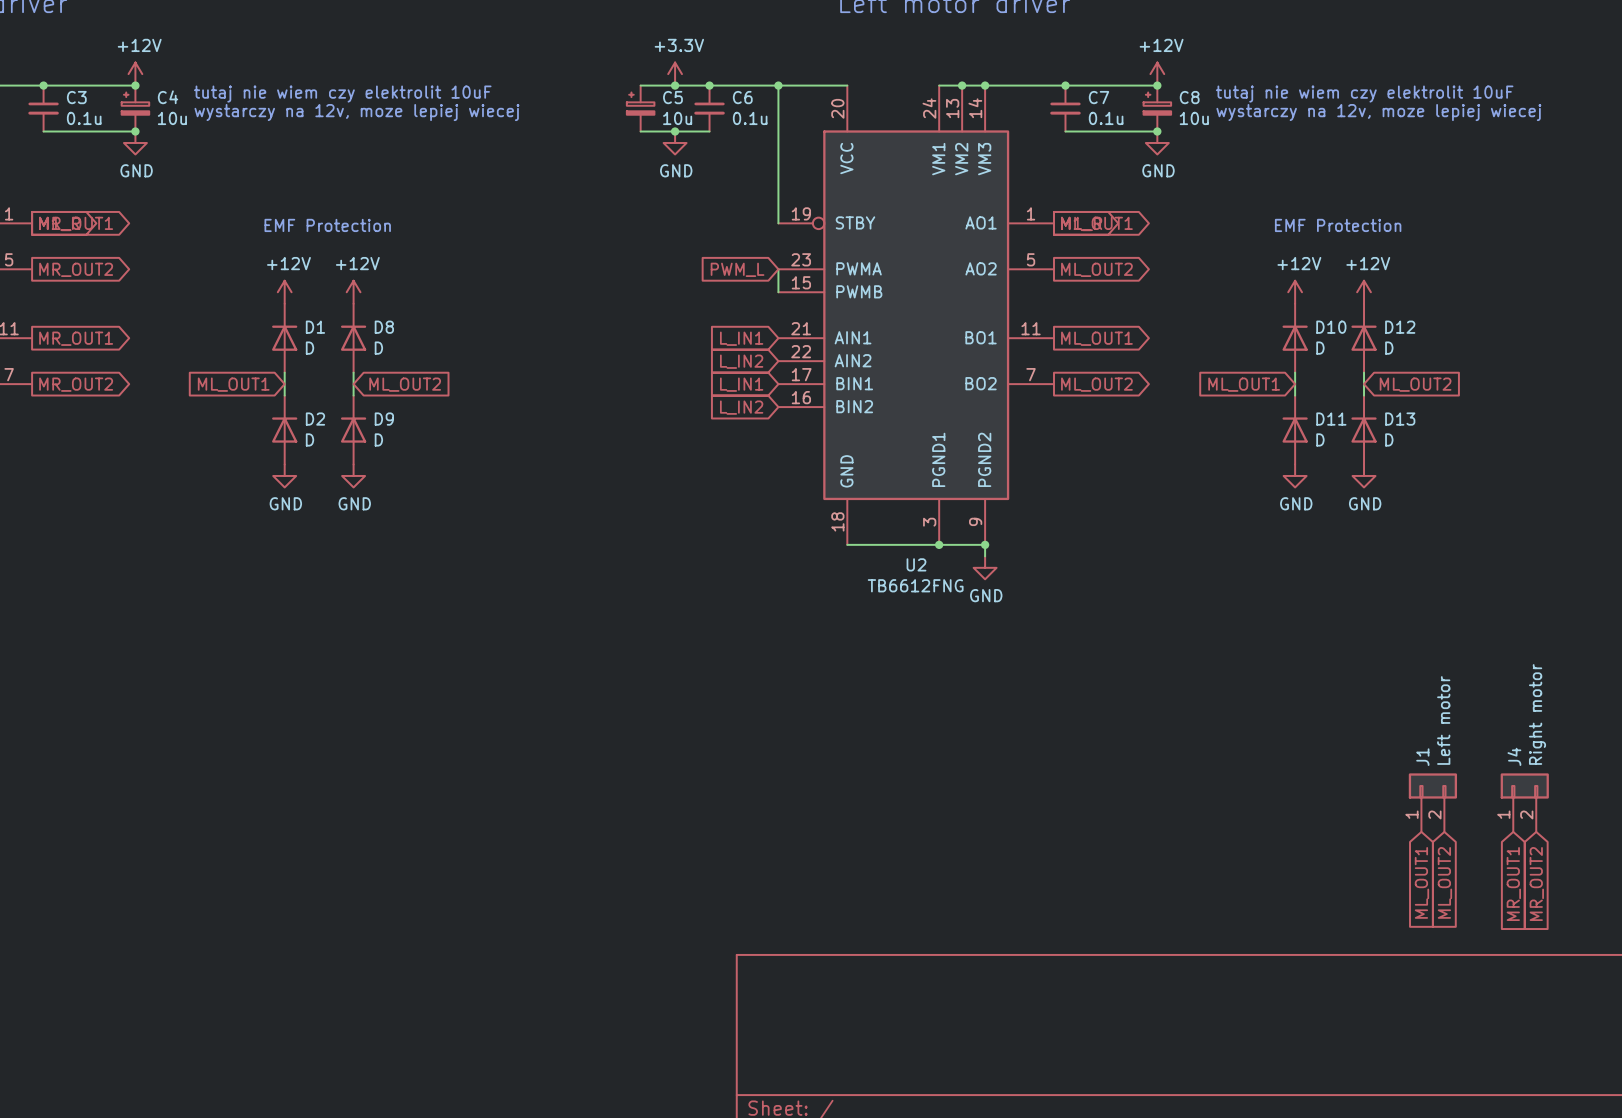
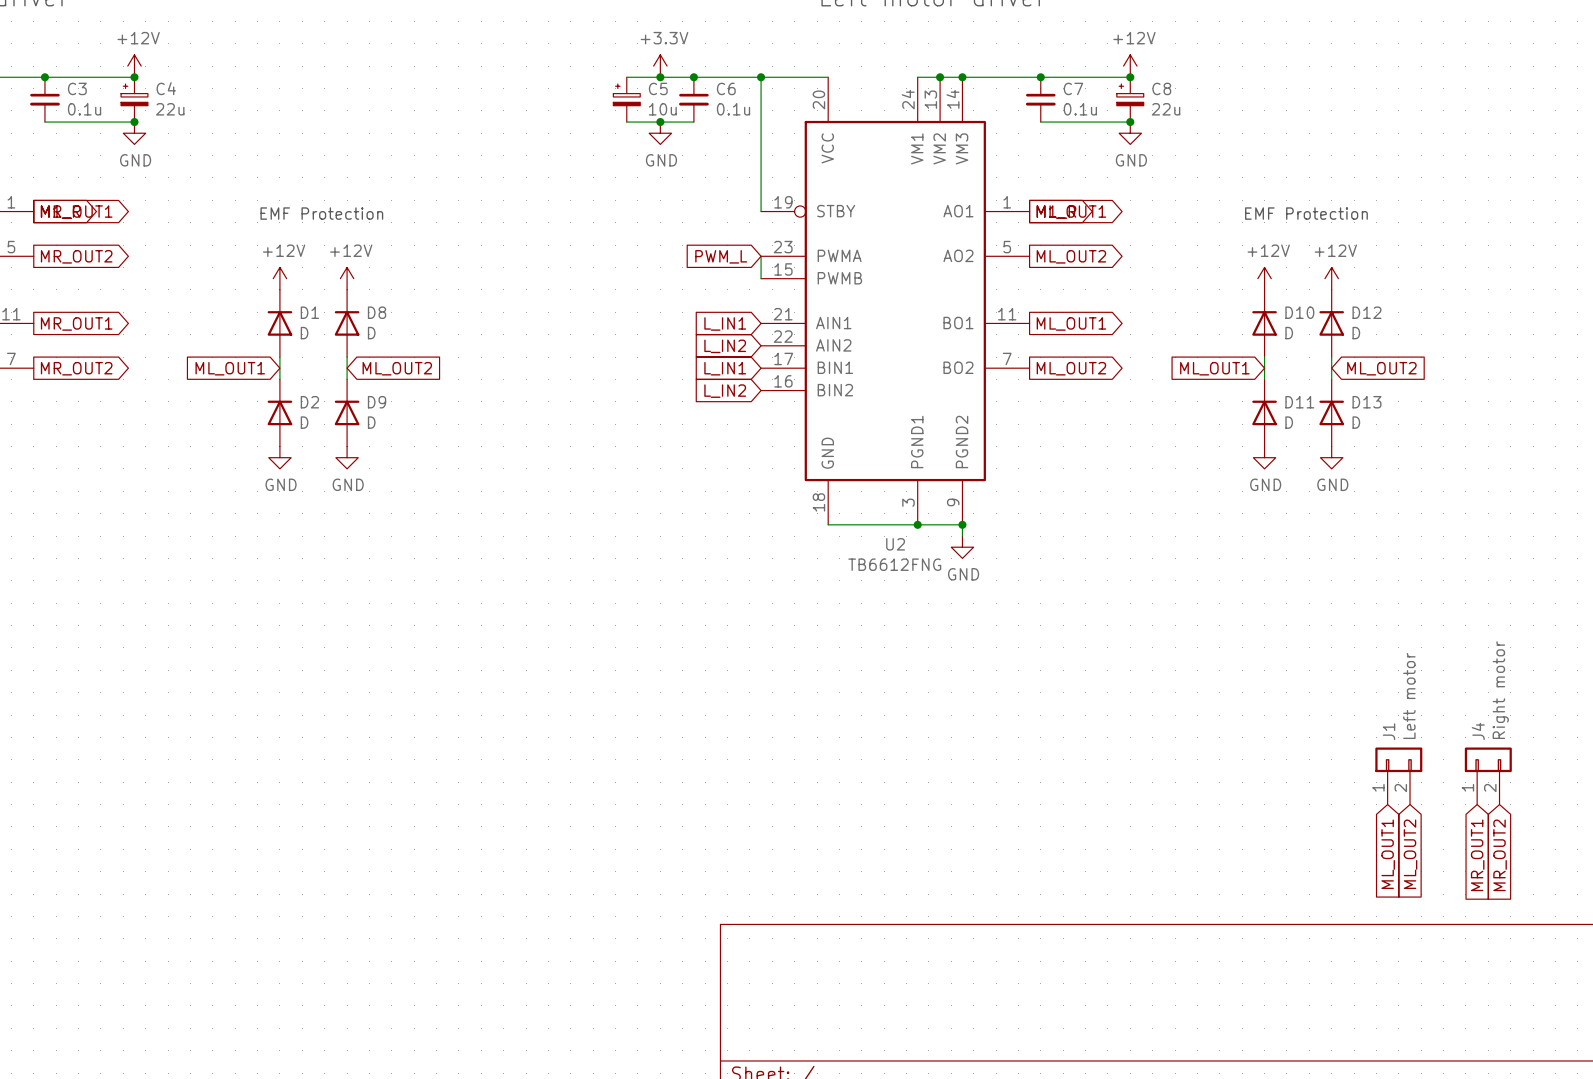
text: tutaj nie wiem czy elektrolit 10uF (342, 94) -> none
text: tutaj nie wiem czy elektrolit 10uF (1364, 94) -> none
text: wystarczy na 12v, moze lepiej wiecej (356, 112) -> none
text: wystarczy na 12v, moze lepiej wiecej (1378, 112) -> none
C4 value: 10u (172, 118) -> 22u (170, 109)
C8 value: 10u (1194, 118) -> 22u (1166, 109)

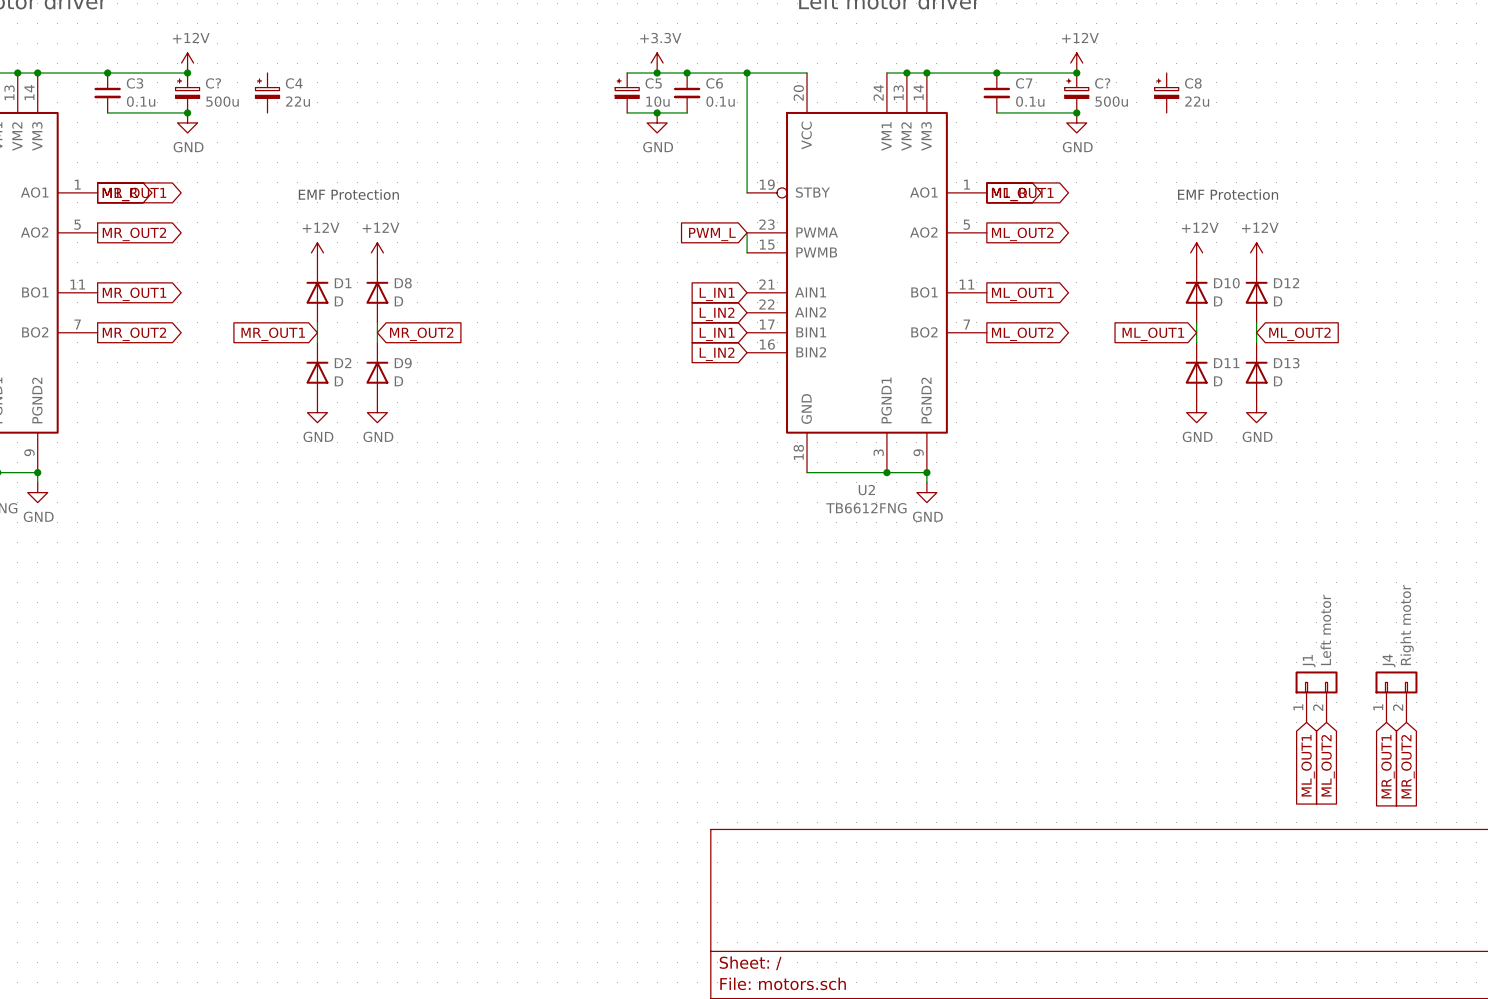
C4 name: C4 (166, 88) -> C? (213, 83)
C8 name: C8 (1161, 88) -> C? (1102, 83)
C4: none -> 22u (267, 92)
C8: none -> 22u (1166, 92)
C4 value: 22u (170, 109) -> 500u (222, 101)
C8 value: 22u (1166, 109) -> 500u (1111, 101)
global label: ML_OUT1 (230, 368) -> MR_OUT1 (273, 334)
global label: ML_OUT2 (397, 368) -> MR_OUT2 (421, 334)

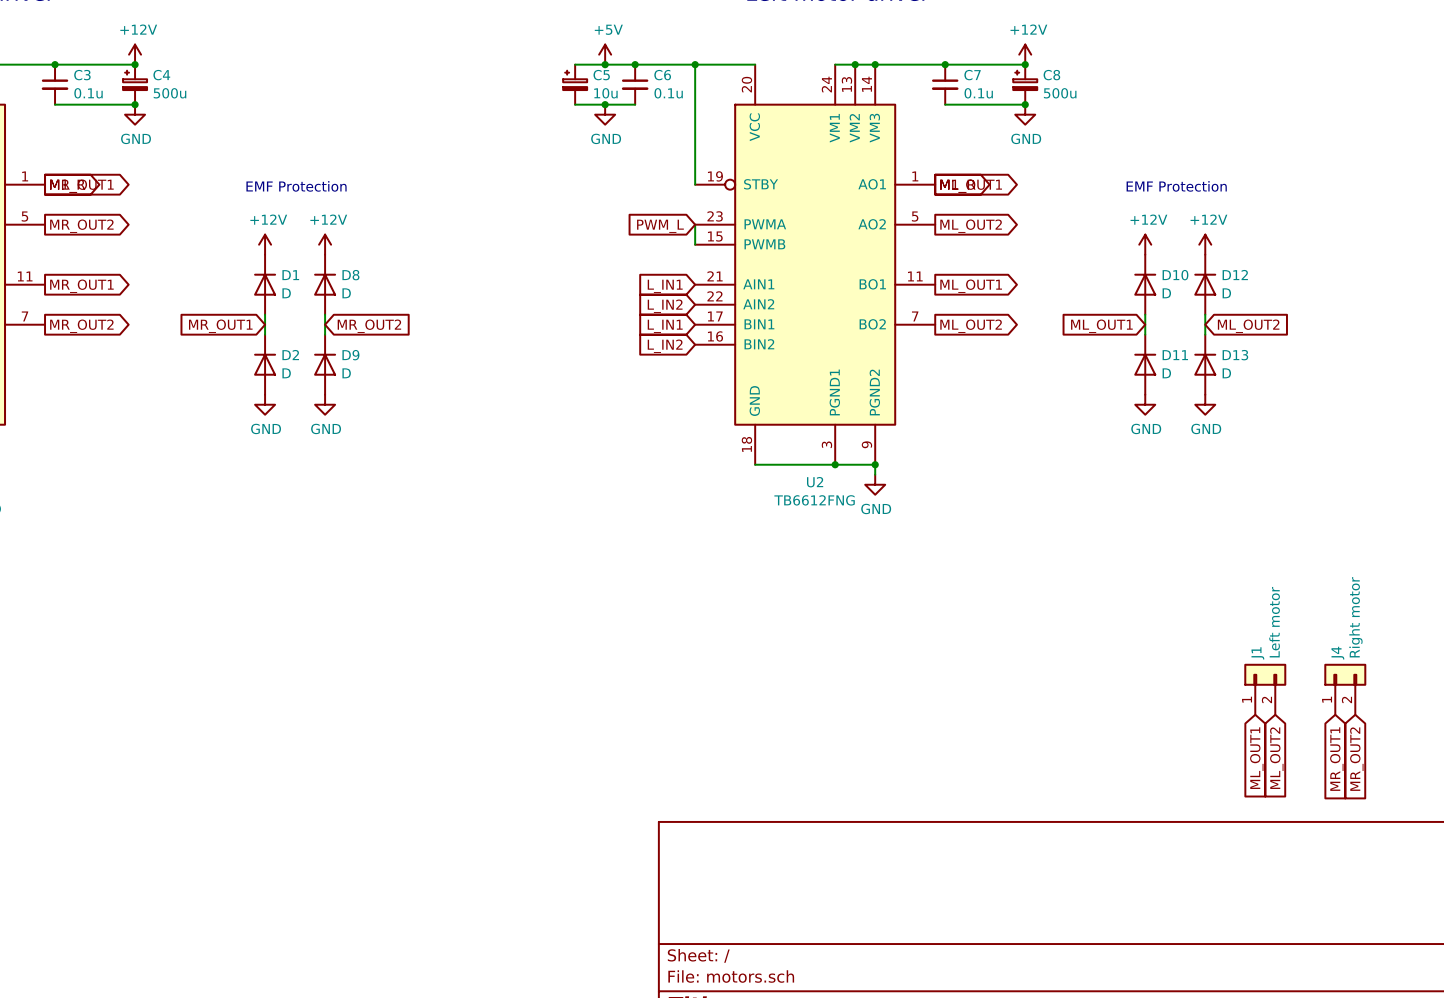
power symbol: +3.3V (657, 63) -> +5V (605, 54)
C? name: C? (213, 83) -> C4 (161, 75)
C? name: C? (1102, 83) -> C8 (1051, 75)
C4: 22u (267, 92) -> none
C8: 22u (1166, 92) -> none

